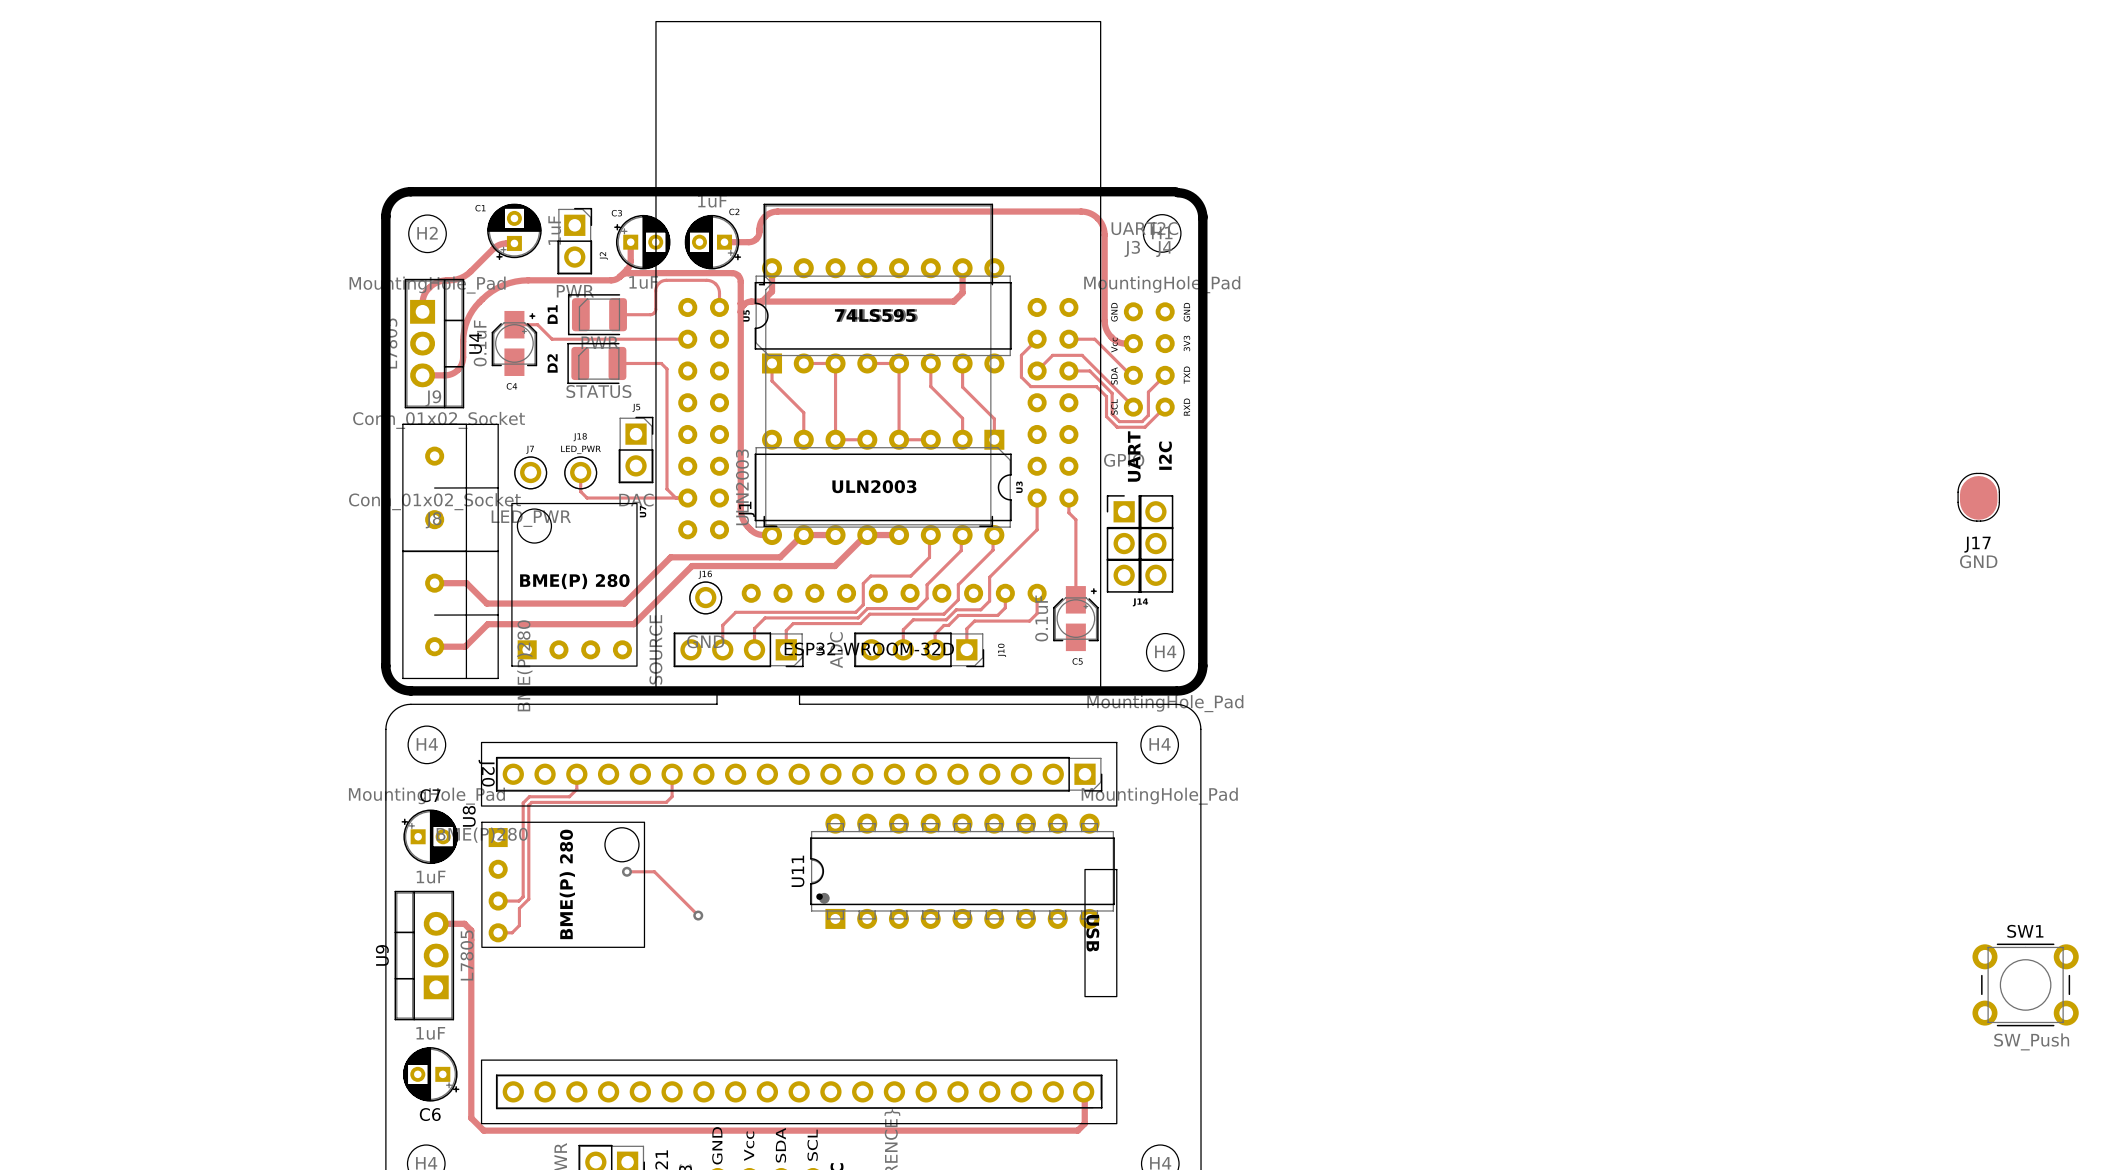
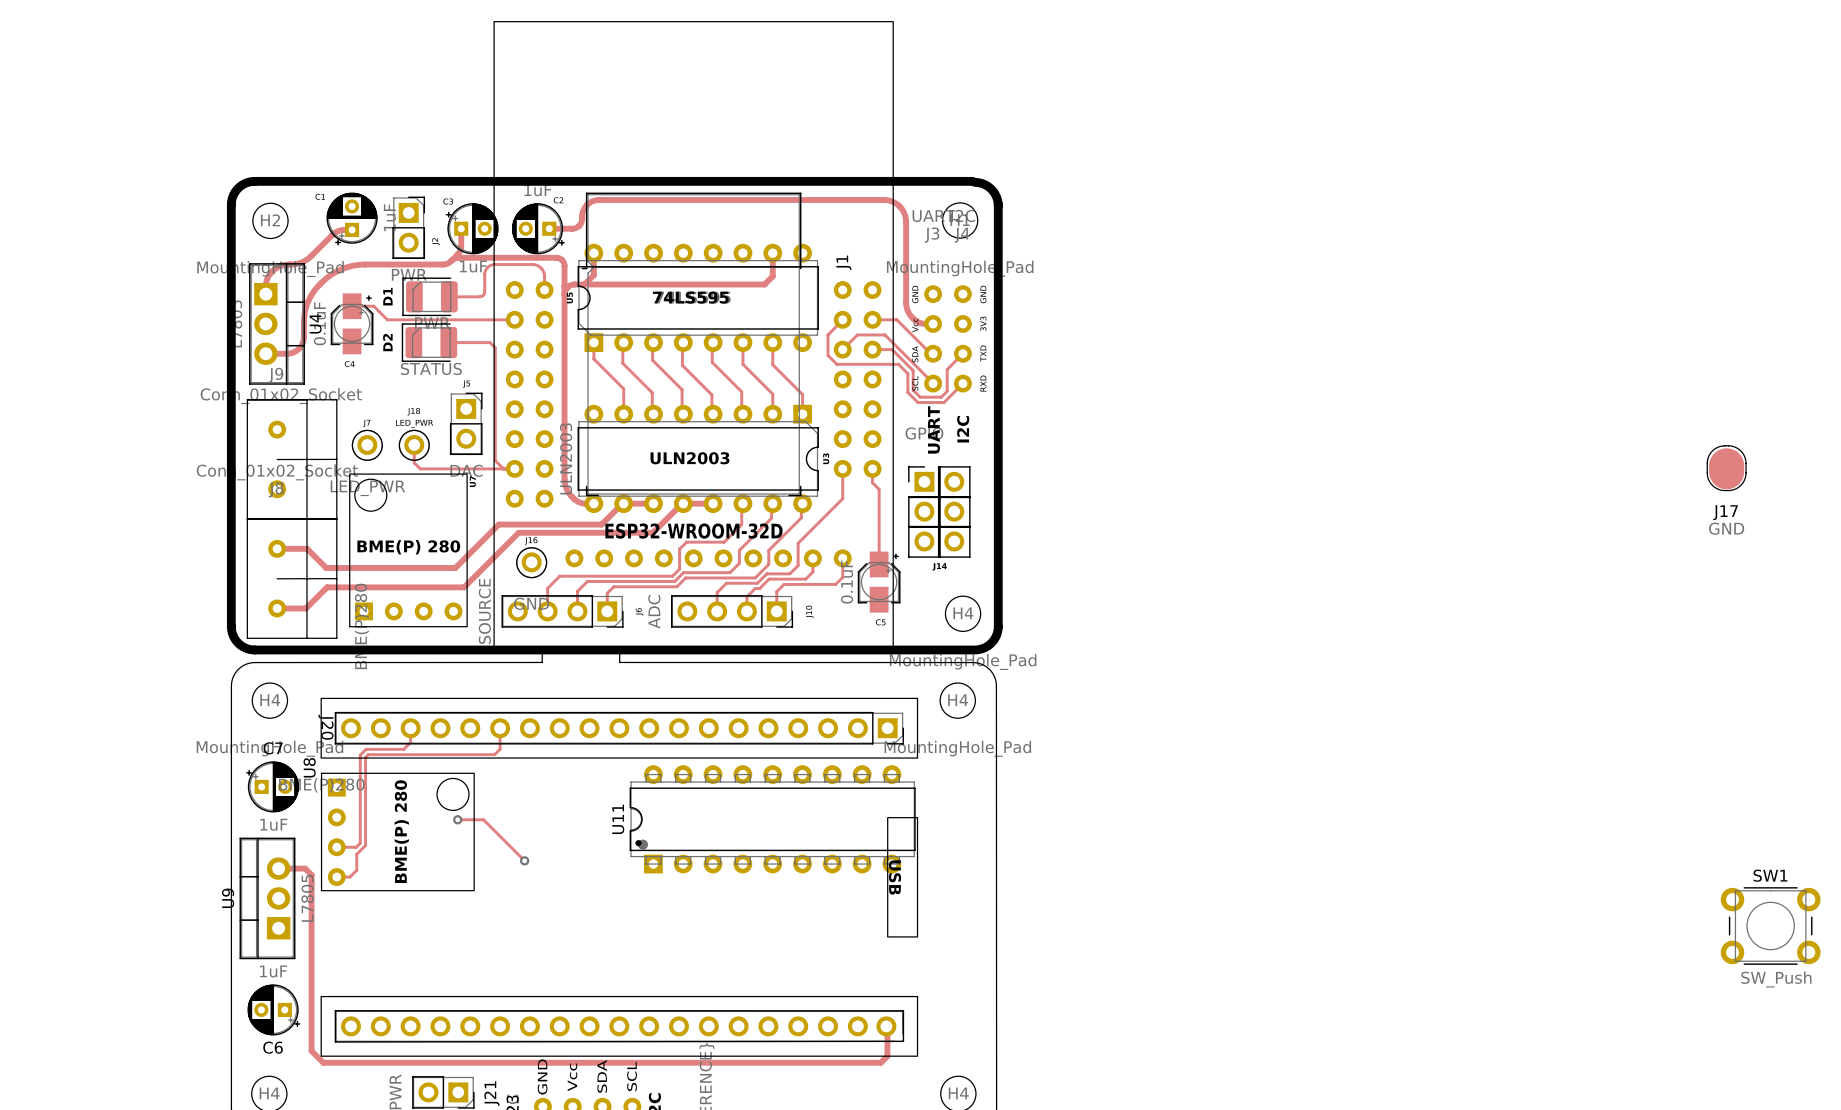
J1 footprint: [655, 20, 1102, 690] -> [493, 21, 894, 649]
track: none -> (622, 342) (622, 363) (652, 392) (652, 414)
track: (803, 363) (835, 363) (835, 439) (867, 439) -> none
track: none -> (652, 342) (652, 360) (682, 389) (682, 414)
track: none -> (682, 342) (682, 365) (711, 394) (711, 414)
track: (867, 363) (899, 363) (899, 439) (930, 439) -> none
track: none -> (712, 342) (712, 362) (741, 391) (741, 414)
J1 name position: J1 (746, 509) -> J1 (843, 262)

